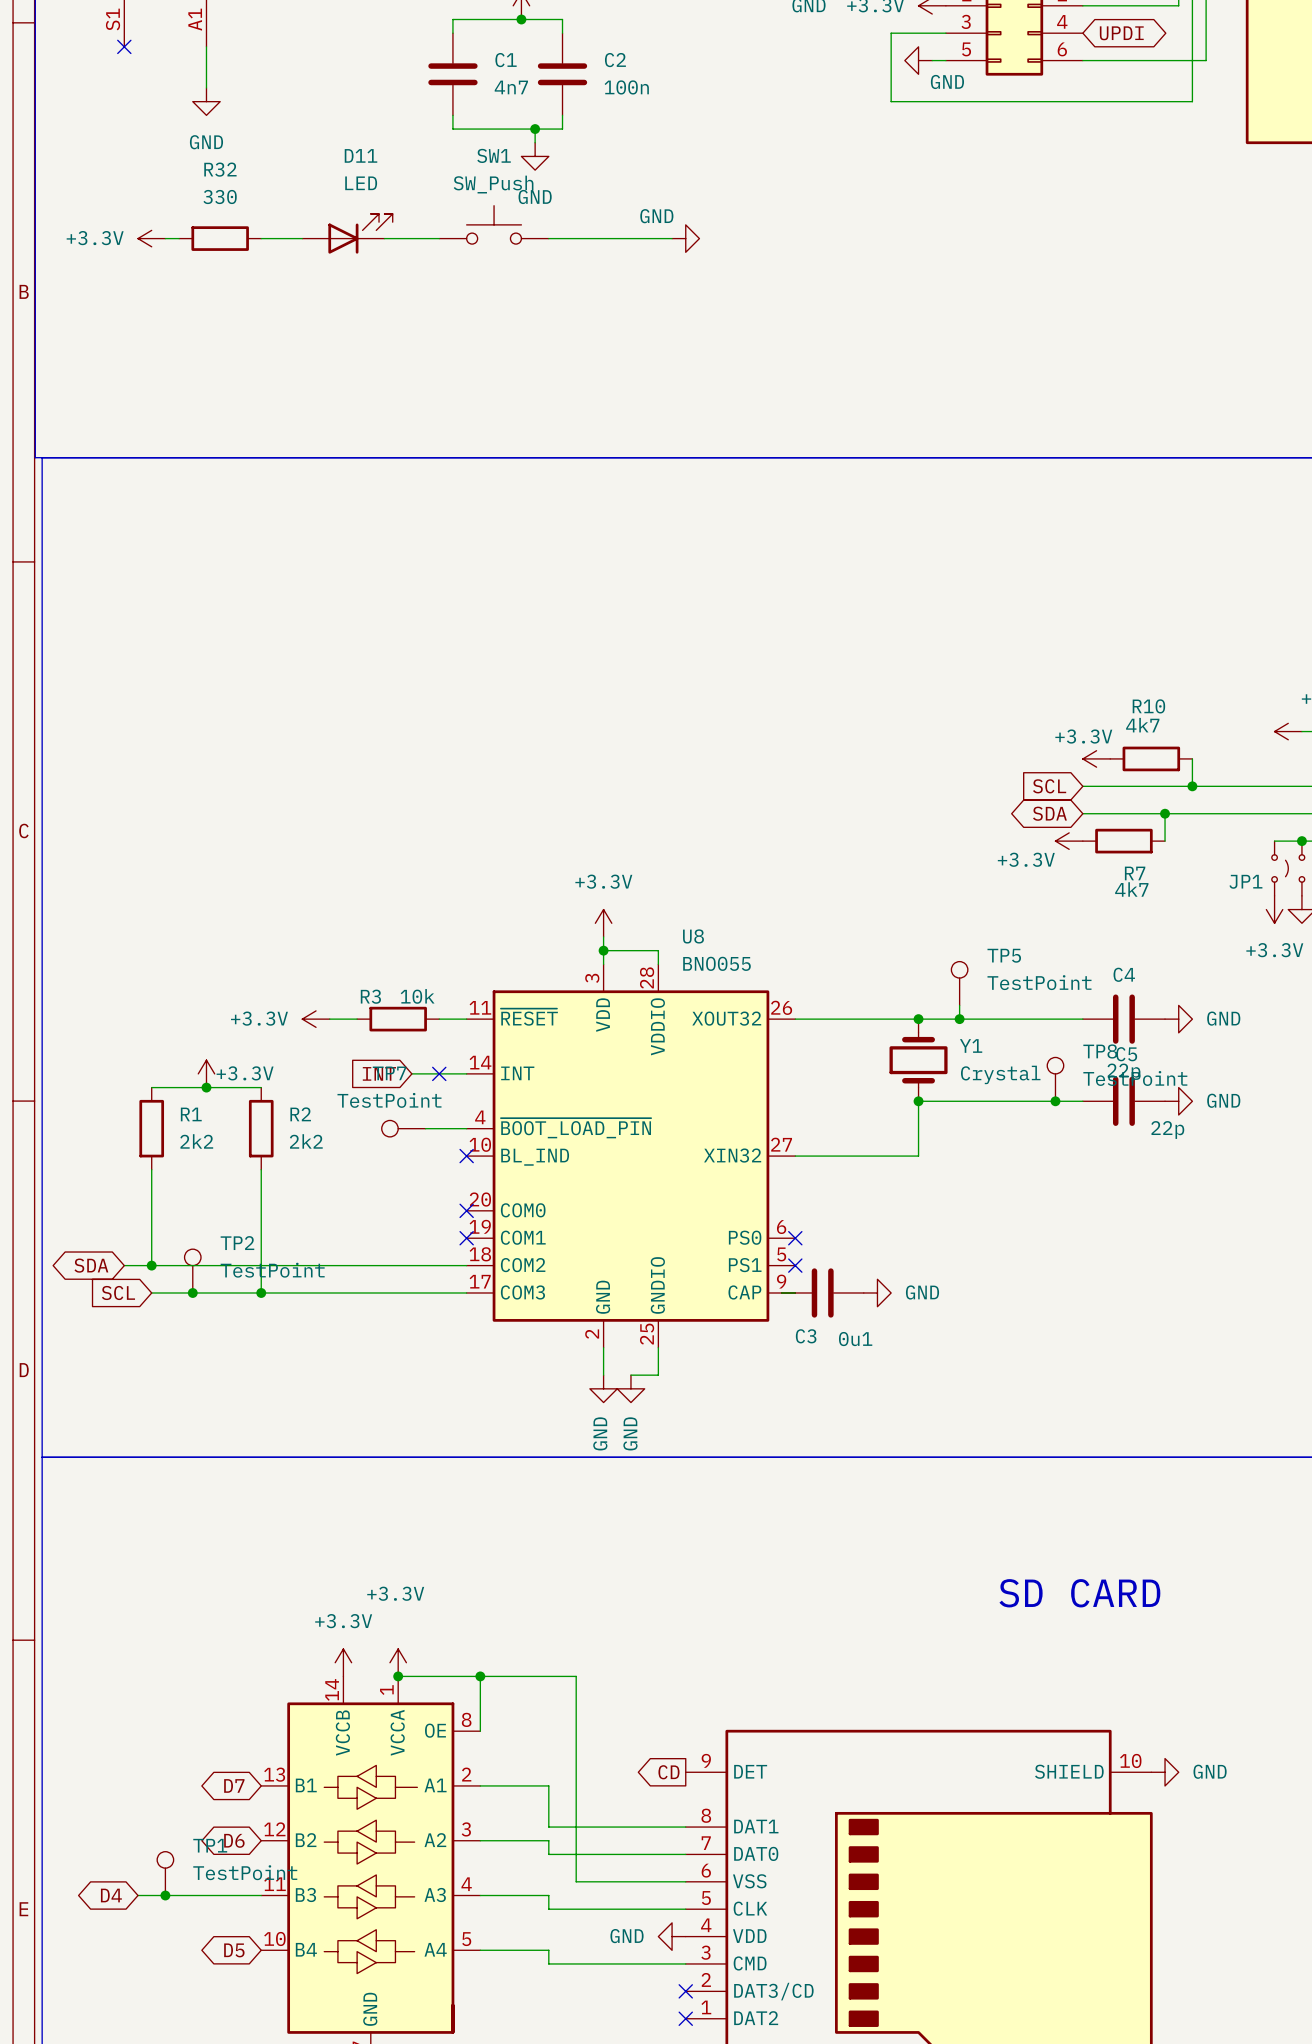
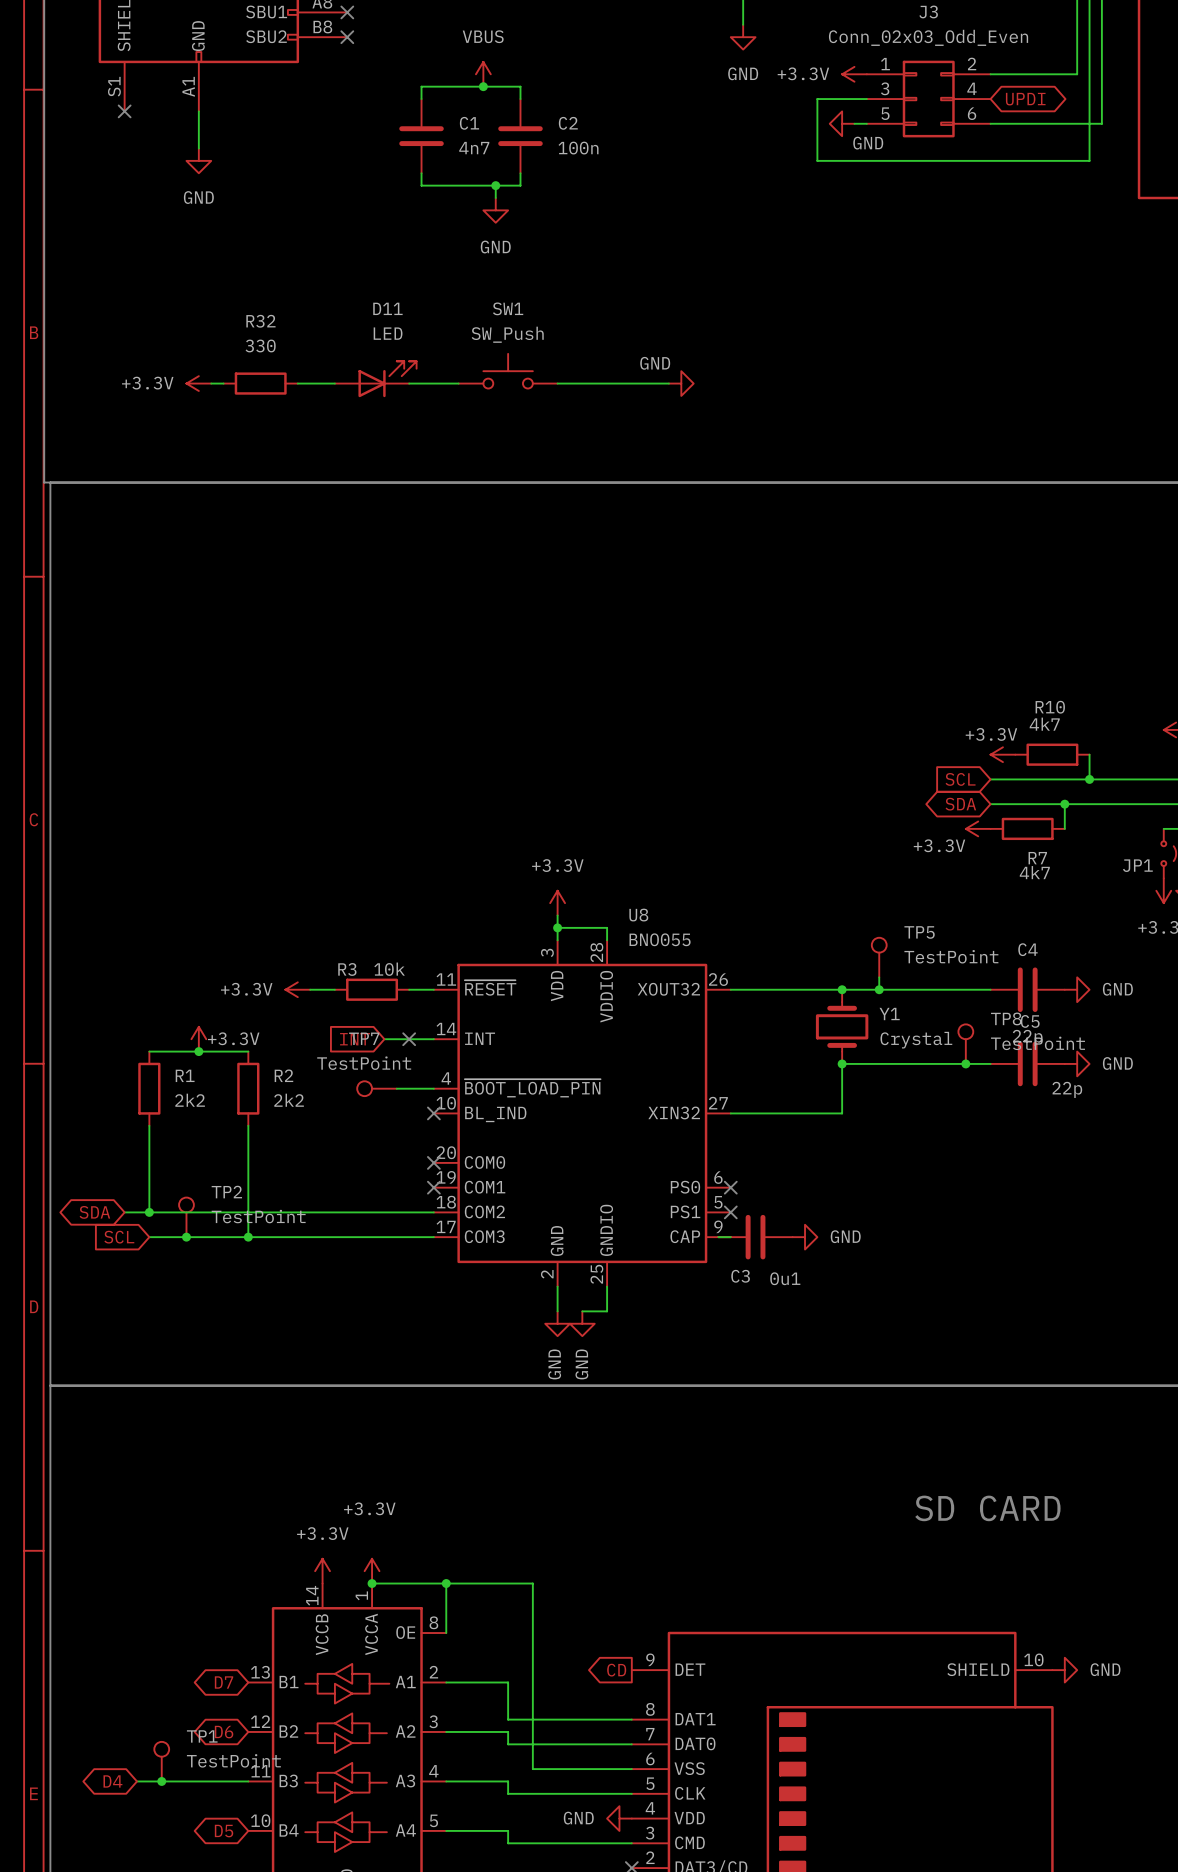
SW1 position: (494, 224) -> (508, 371)
D11 position: (347, 233) -> (375, 379)
power symbol position: +3.3V (151, 238) -> +3.3V (198, 383)
wire: (165, 238) (179, 238) -> (211, 383) (223, 383)
R32 position: (220, 238) -> (260, 383)
wire: (261, 238) (302, 238) -> (297, 383) (334, 383)
wire: (384, 238) (439, 238) -> (409, 383) (458, 383)
wire: (548, 238) (672, 238) -> (557, 383) (668, 383)
power symbol position: GND (685, 238) -> GND (681, 383)

